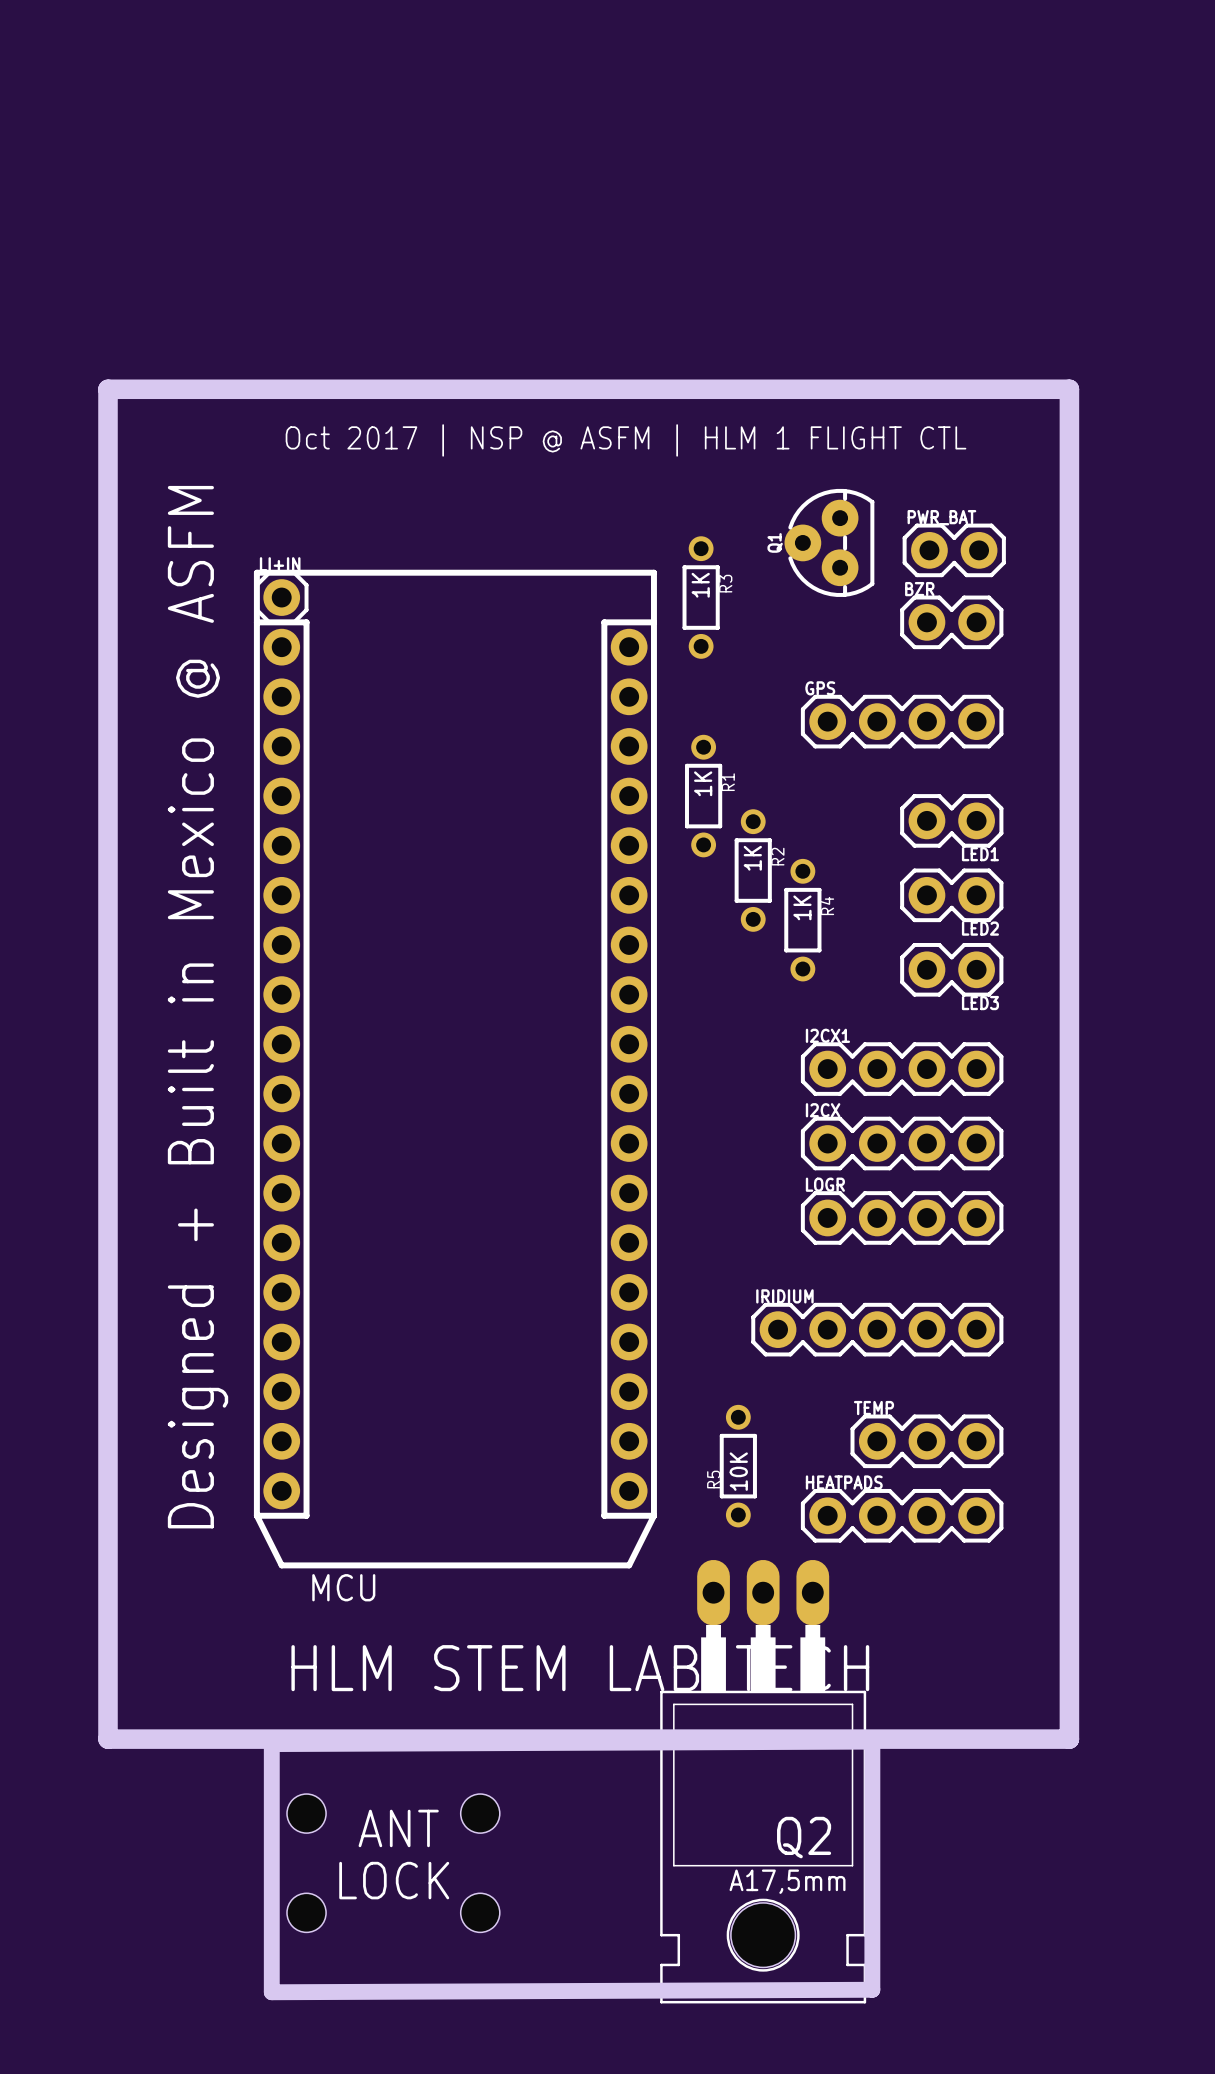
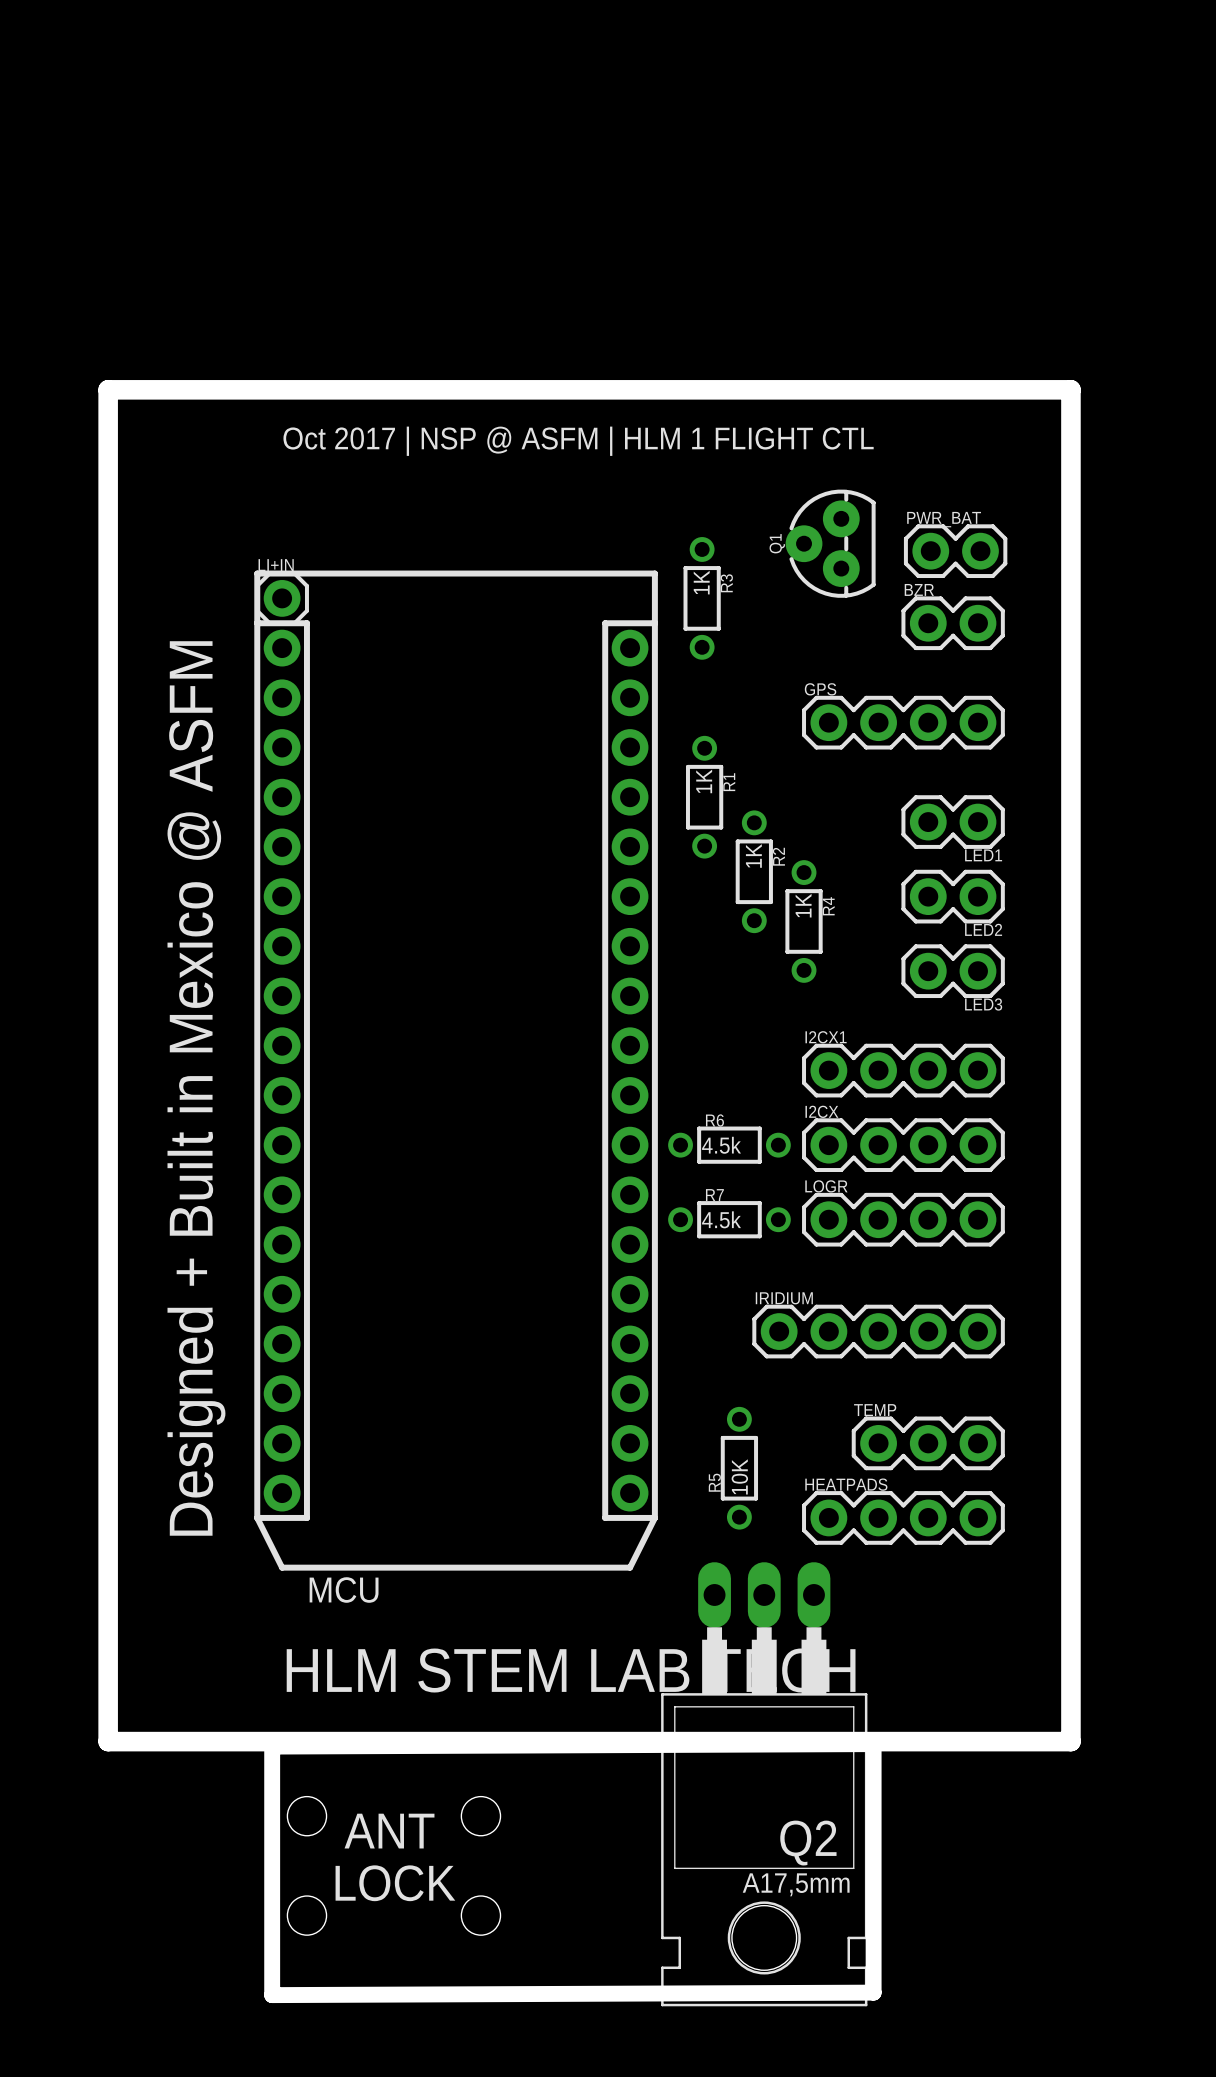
R6: none -> 4.5k (729, 1145)
R7: none -> 4.5k (729, 1219)

